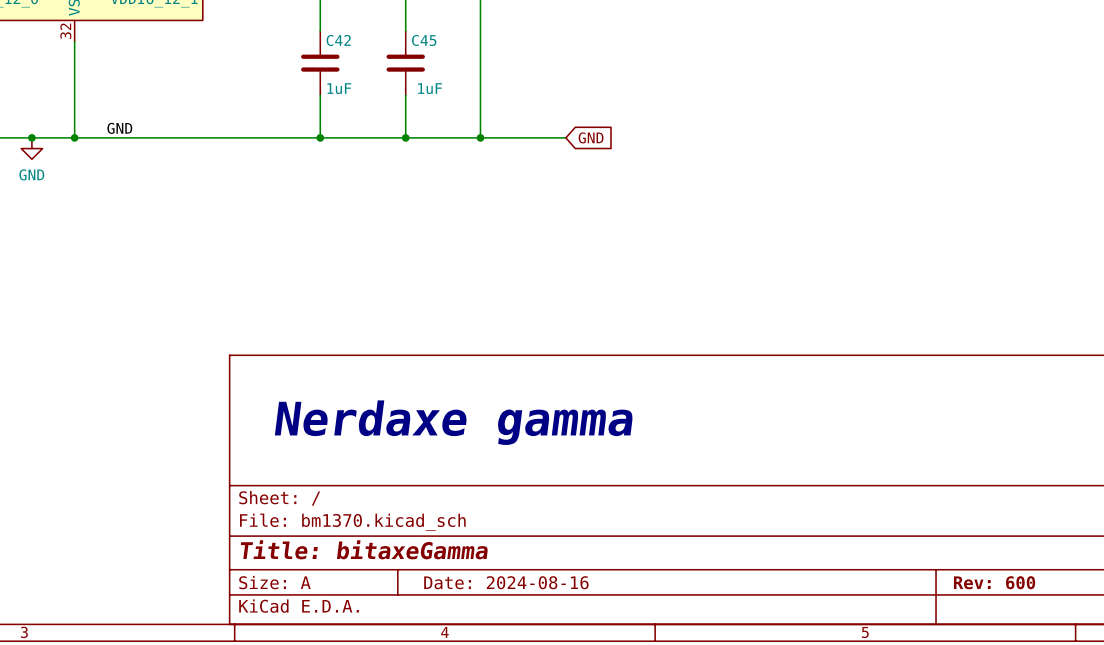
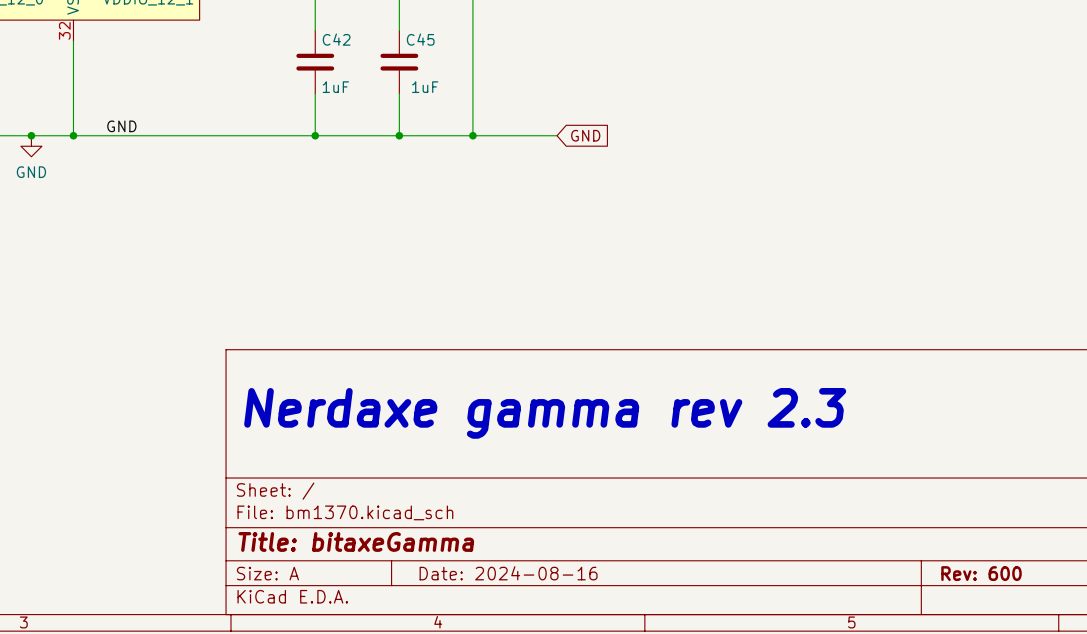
text: Nerdaxe gamma (453, 422) -> Nerdaxe gamma rev 2.3 (545, 413)

